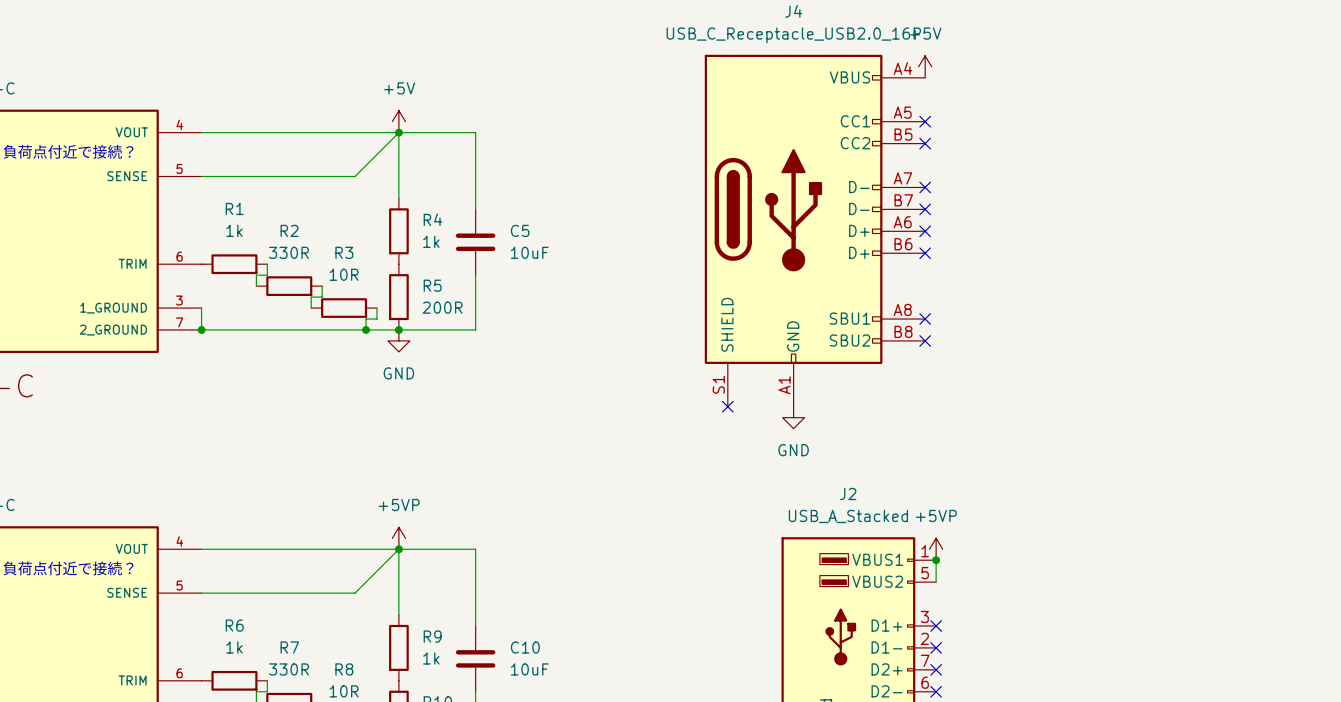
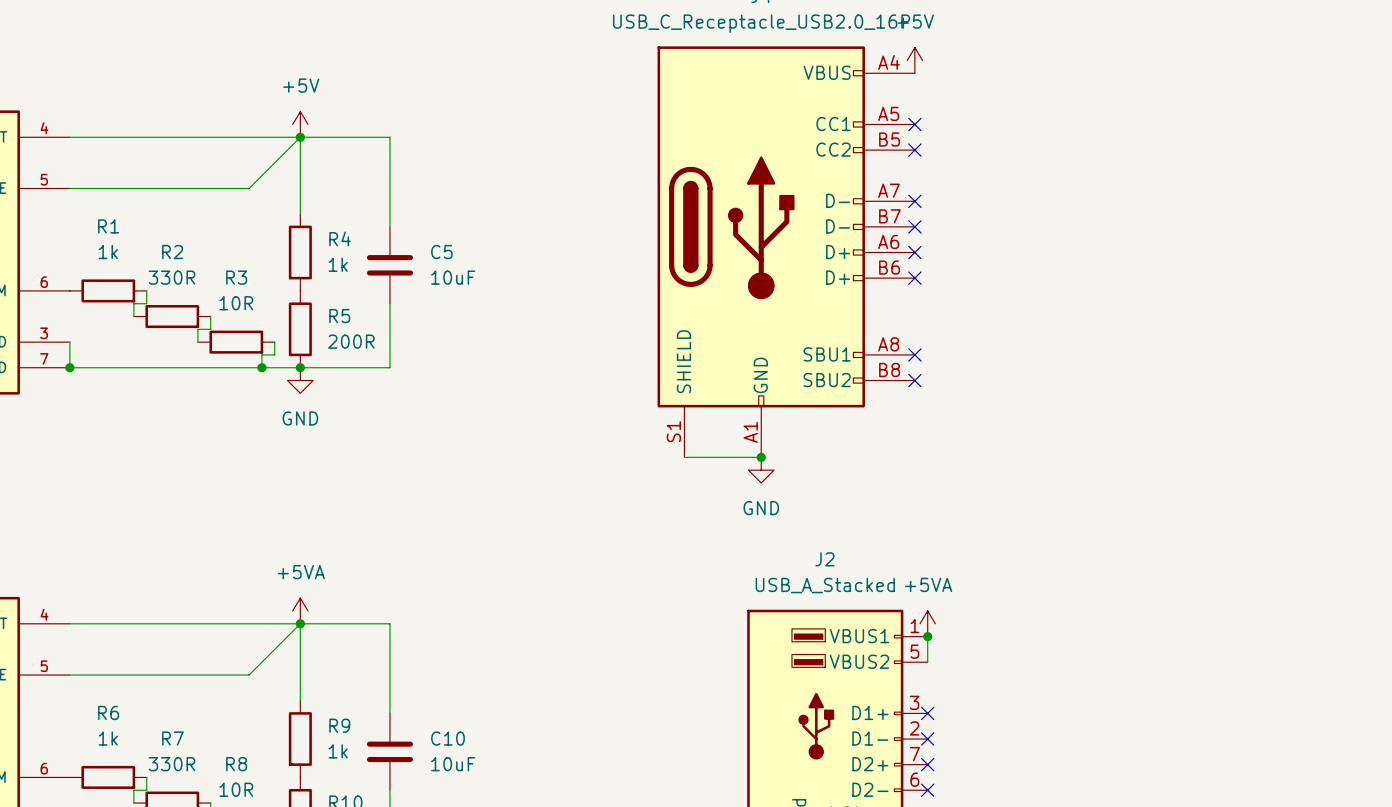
wire: none -> (684, 457) (761, 457)
no-connect mark: (727, 406) -> none
junction: none -> (761, 457)
power symbol: +5VP (398, 538) -> +5VA (300, 611)
power symbol: +5VP (936, 549) -> +5VA (927, 623)

